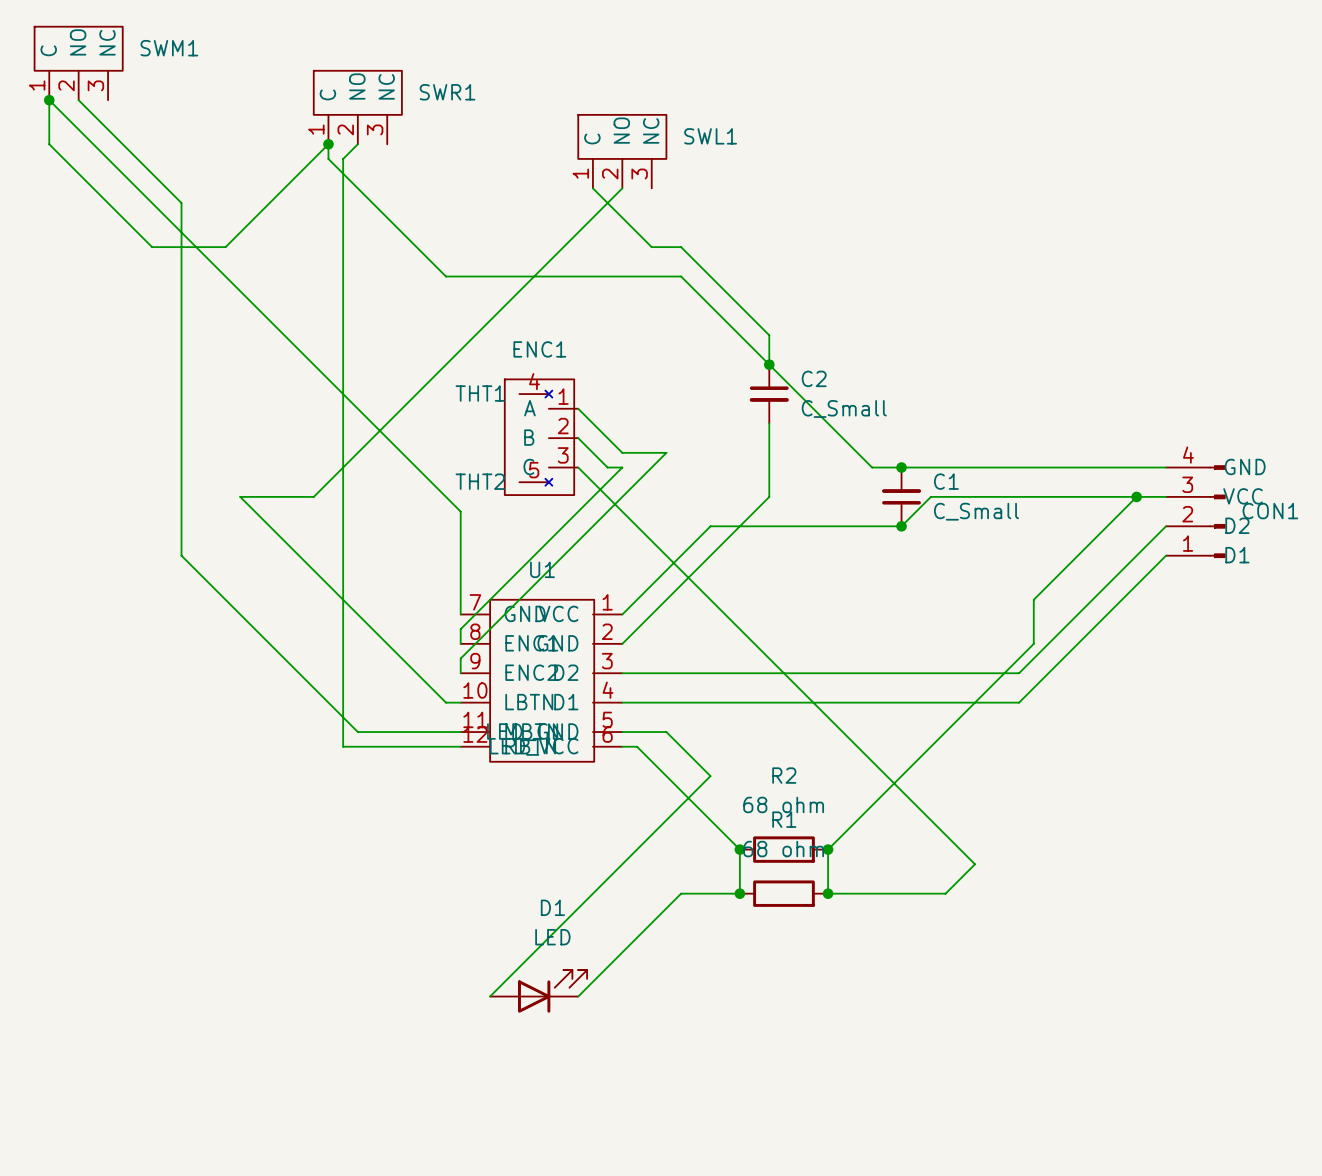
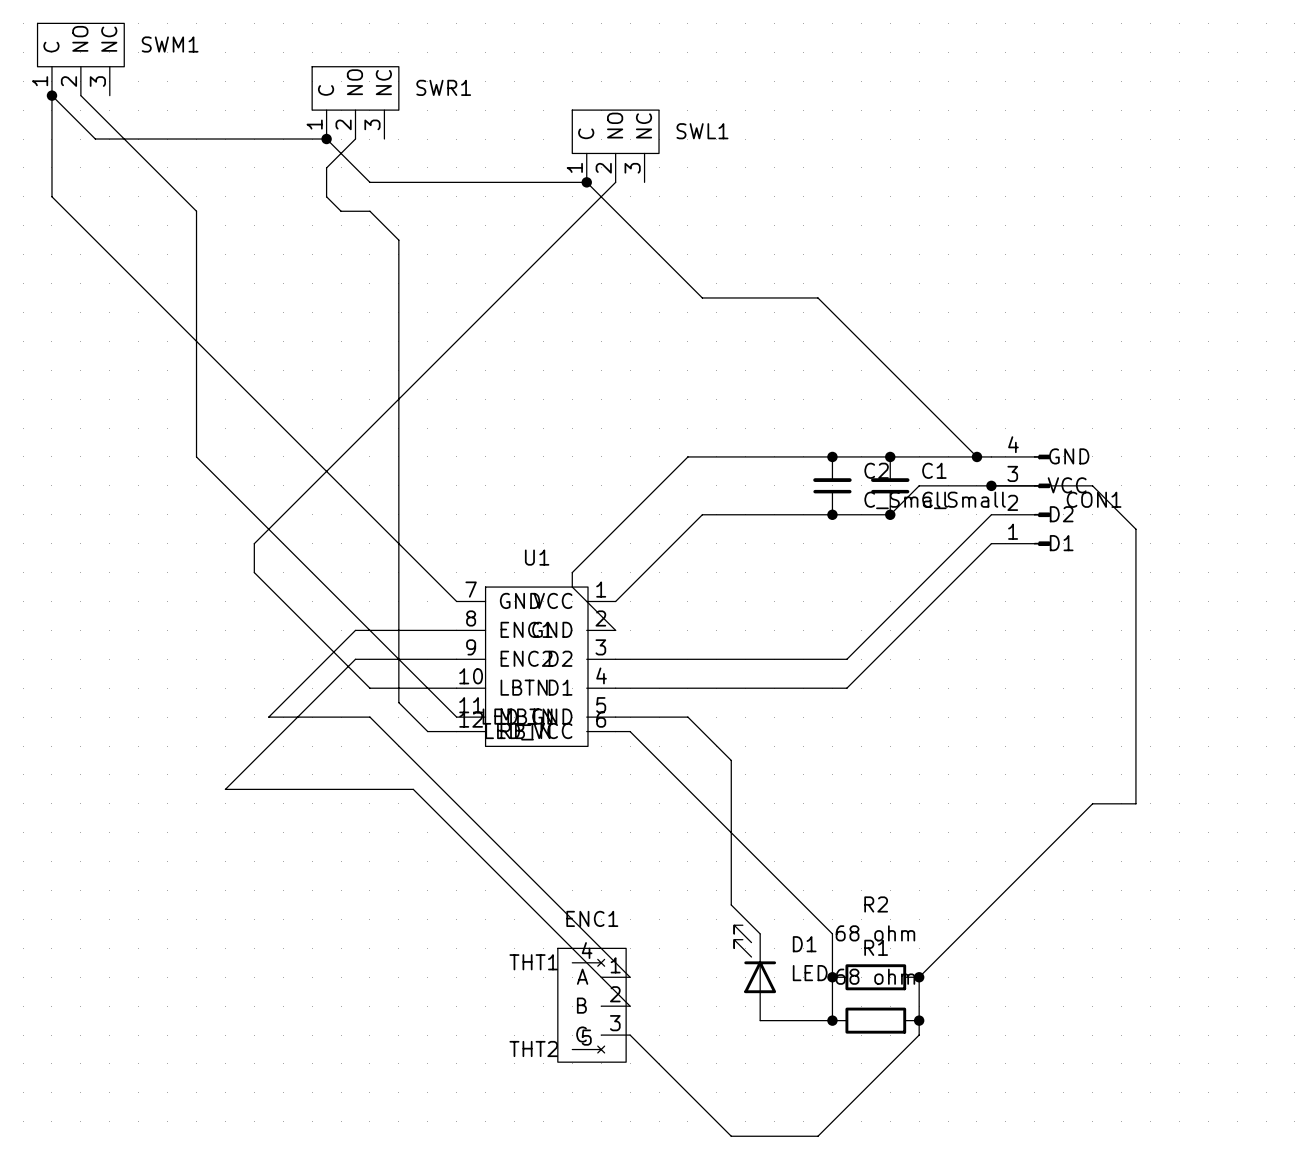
wire: (49, 144) (152, 247) (225, 247) (328, 144) (328, 158) (446, 276) (681, 276) -> none
wire: (93, 144) (460, 511) (460, 614) -> (51, 139) (51, 196) (456, 601)
wire: none -> (95, 139) (326, 139) (369, 182) (586, 182)
wire: (343, 158) (343, 746) (431, 746) -> (341, 153) (326, 167) (326, 196) (341, 211) (369, 211) (398, 240) (398, 702) (427, 731)
junction: none -> (586, 182)
wire: (181, 203) (181, 555) (357, 732) -> (182, 196) (196, 211) (196, 456) (456, 717)
wire: (651, 247) (681, 247) (769, 335) (769, 364) -> (644, 240) (673, 269)
wire: (710, 305) (872, 467) -> (702, 297) (817, 297) (976, 456)
junction: (769, 364) -> none
C2 rotation: 0° (769, 394) -> 180° (832, 485)
C2 position: (769, 394) -> (832, 485)
wire: (578, 408) (622, 452) (666, 452) (460, 658) (460, 673) -> (630, 1006) (413, 789) (225, 789) (355, 659) (456, 659)
wire: (769, 423) (769, 496) (622, 643) -> (861, 456) (687, 456) (572, 572) (572, 587) (615, 630)
ENC1 position: (541, 437) -> (593, 1005)
wire: (578, 438) (607, 467) (622, 467) (460, 629) (460, 643) -> (355, 717) (268, 717) (355, 630) (456, 630)
wire: (578, 467) (975, 864) (945, 893) (828, 893) (828, 849) (1033, 643) (1033, 599) (1136, 496) -> none
junction: none -> (832, 456)
junction: none -> (976, 456)
wire: (1004, 467) (1166, 467) -> none
wire: (313, 496) (240, 496) (446, 702) -> (312, 485) (254, 543) (254, 572) (369, 688) (442, 688)
junction: none -> (991, 485)
wire: (1107, 496) (1166, 496) -> (1092, 485) (1135, 529) (1135, 803) (1092, 803) (919, 977) (919, 1035) (817, 1136) (731, 1136) (630, 1035)
junction: (1136, 496) -> none
CON1 position: (1195, 511) -> (1020, 500)
junction: none -> (832, 514)
wire: (1166, 526) (1019, 673) (857, 673) -> (991, 514) (846, 659)
wire: (1166, 555) (1019, 702) (857, 702) -> (991, 543) (846, 688)
wire: (372, 732) (460, 732) -> (369, 717) (630, 977)
wire: (666, 732) (710, 776) (490, 996) -> (659, 717) (687, 717) (731, 760) (731, 832) (832, 933) (832, 1020) (760, 1020)
junction: (739, 849) -> none
R2 position: (783, 849) -> (875, 977)
junction: (828, 849) -> none
wire: (739, 893) (681, 893) (578, 996) -> (731, 876) (731, 905) (760, 933)
junction: (739, 893) -> none
R1 position: (783, 893) -> (875, 1020)
junction: (828, 893) -> none
D1 name position: D1 (552, 907) -> D1 (804, 944)
D1 value position: LED (552, 937) -> LED (810, 973)
D1 position: (538, 991) -> (755, 972)
D1 rotation: 0° (552, 991) -> 90° counterclockwise (755, 959)
junction: none -> (832, 977)
junction: none -> (919, 977)
junction: none -> (832, 1020)
junction: none -> (919, 1020)

